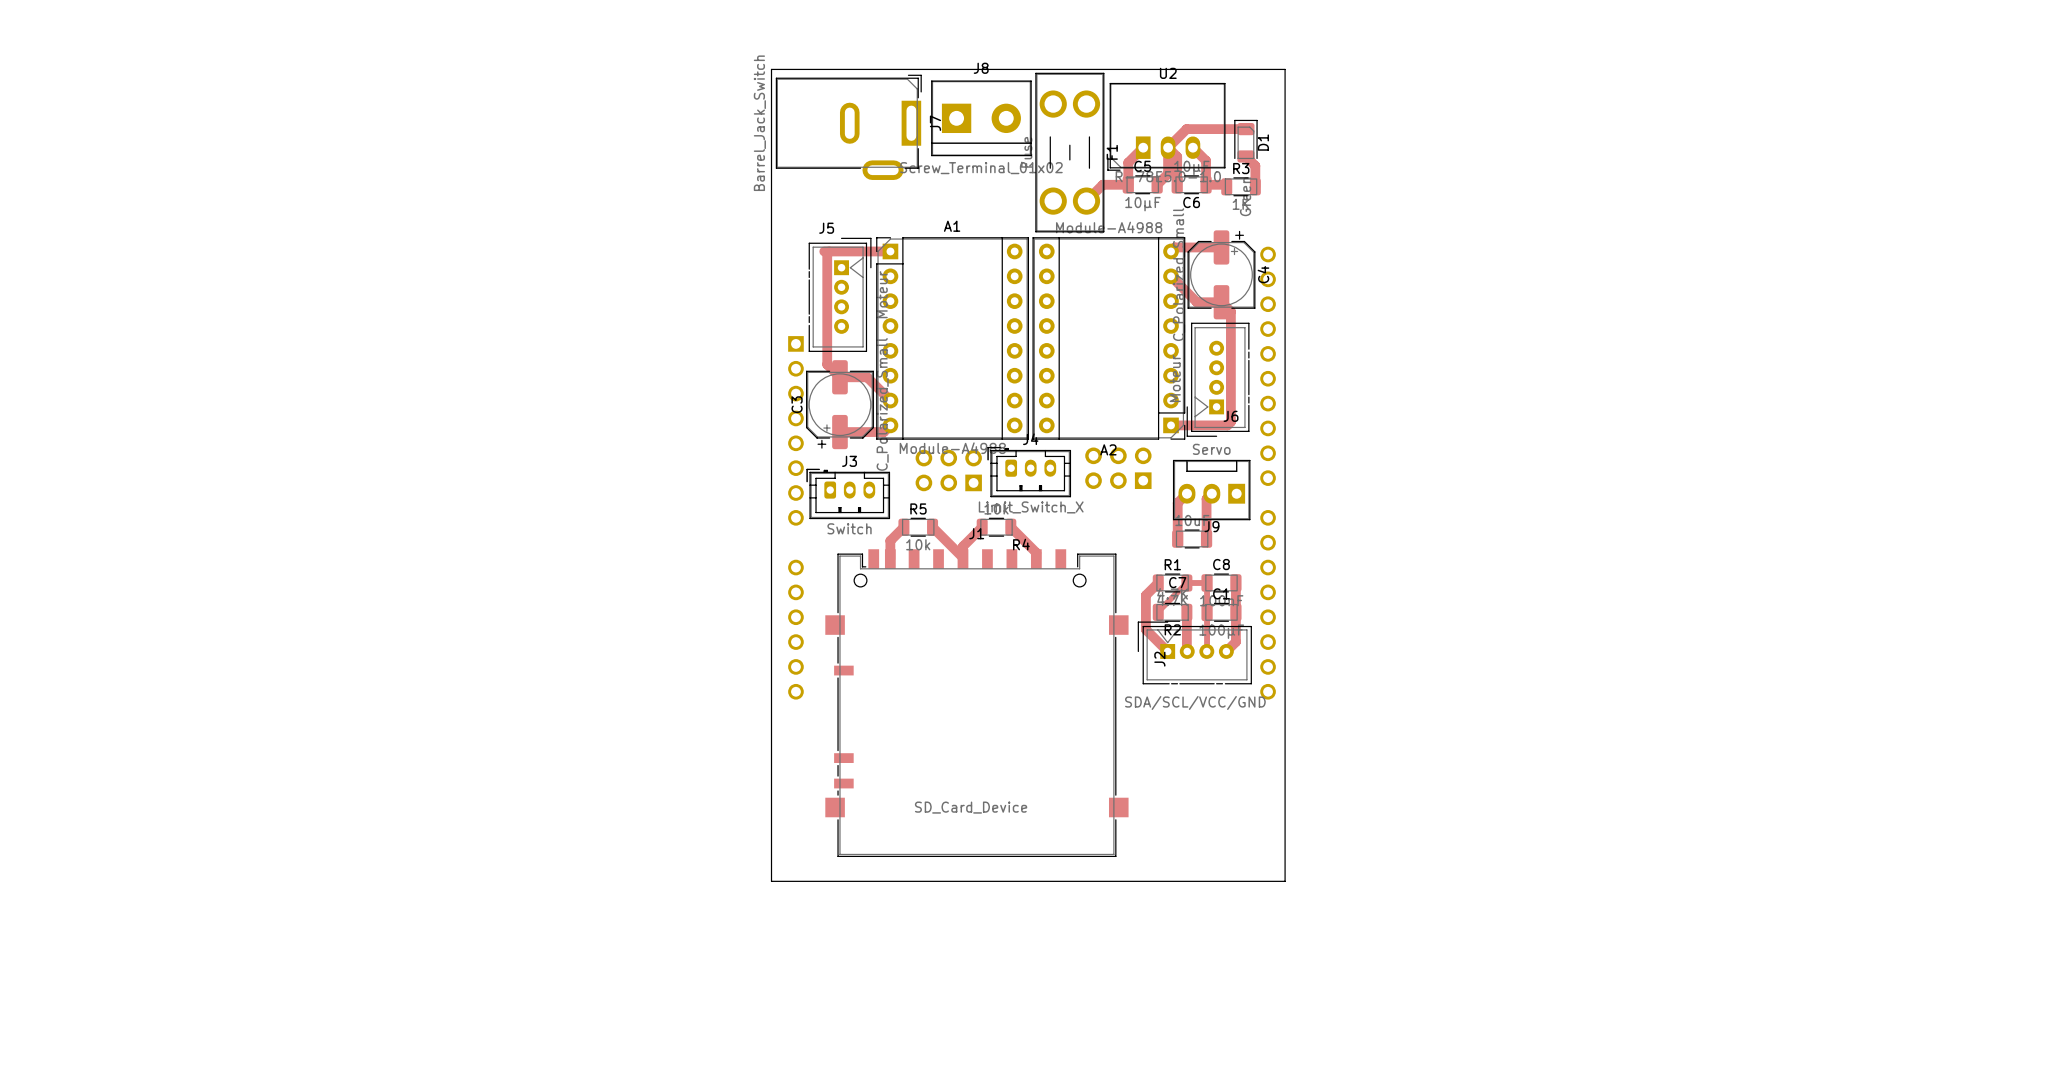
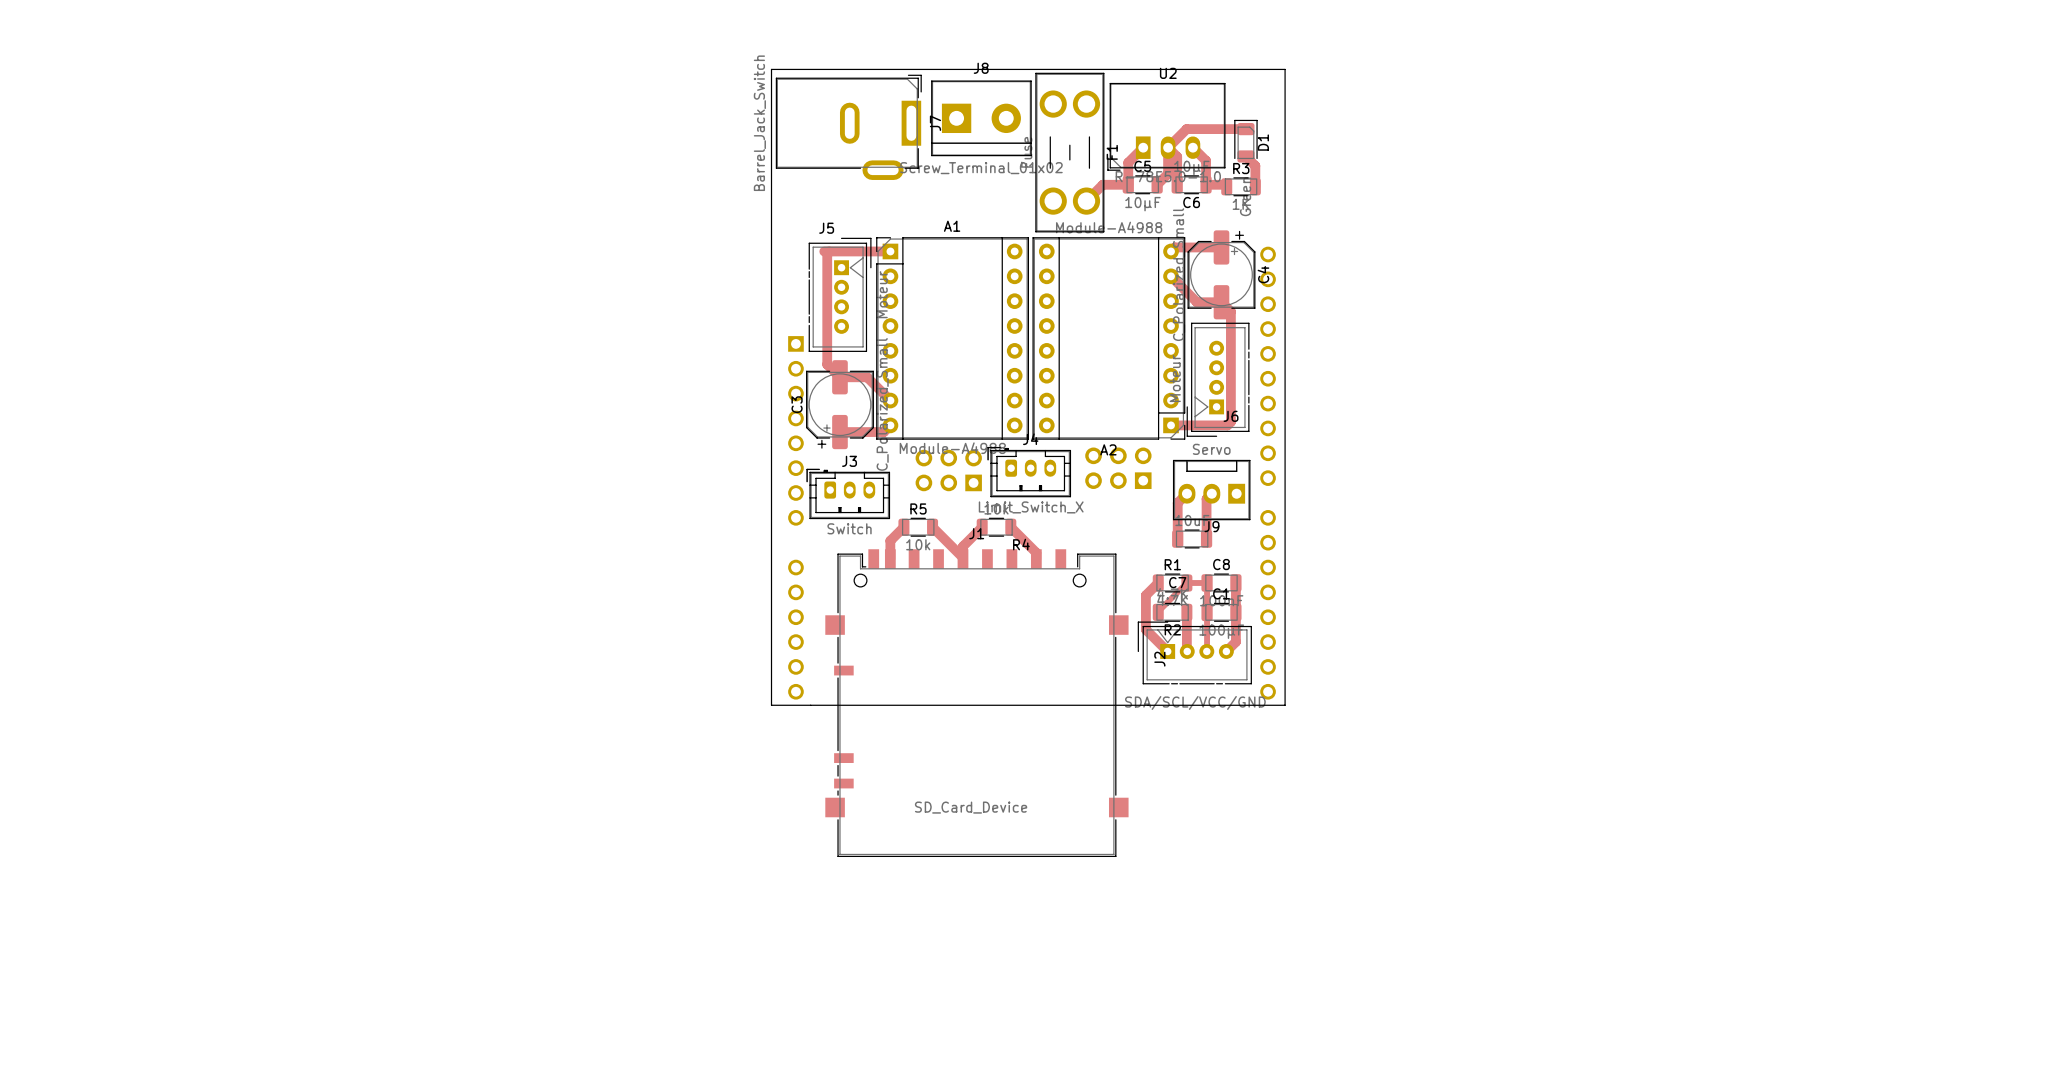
board edge: (771, 705) (771, 881) (1285, 881) (1285, 705) -> (771, 705) (1285, 705)

